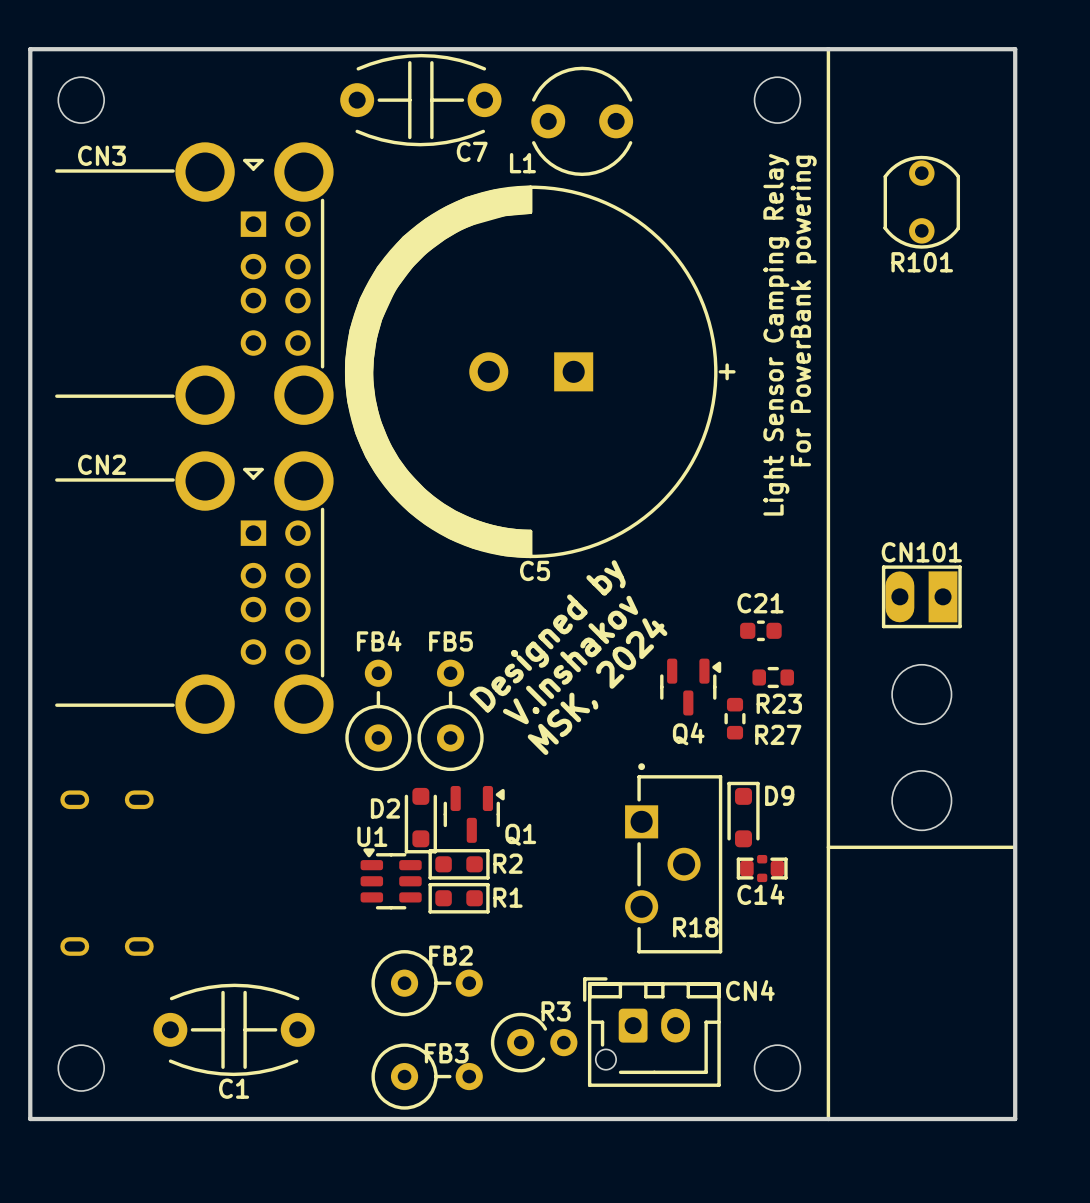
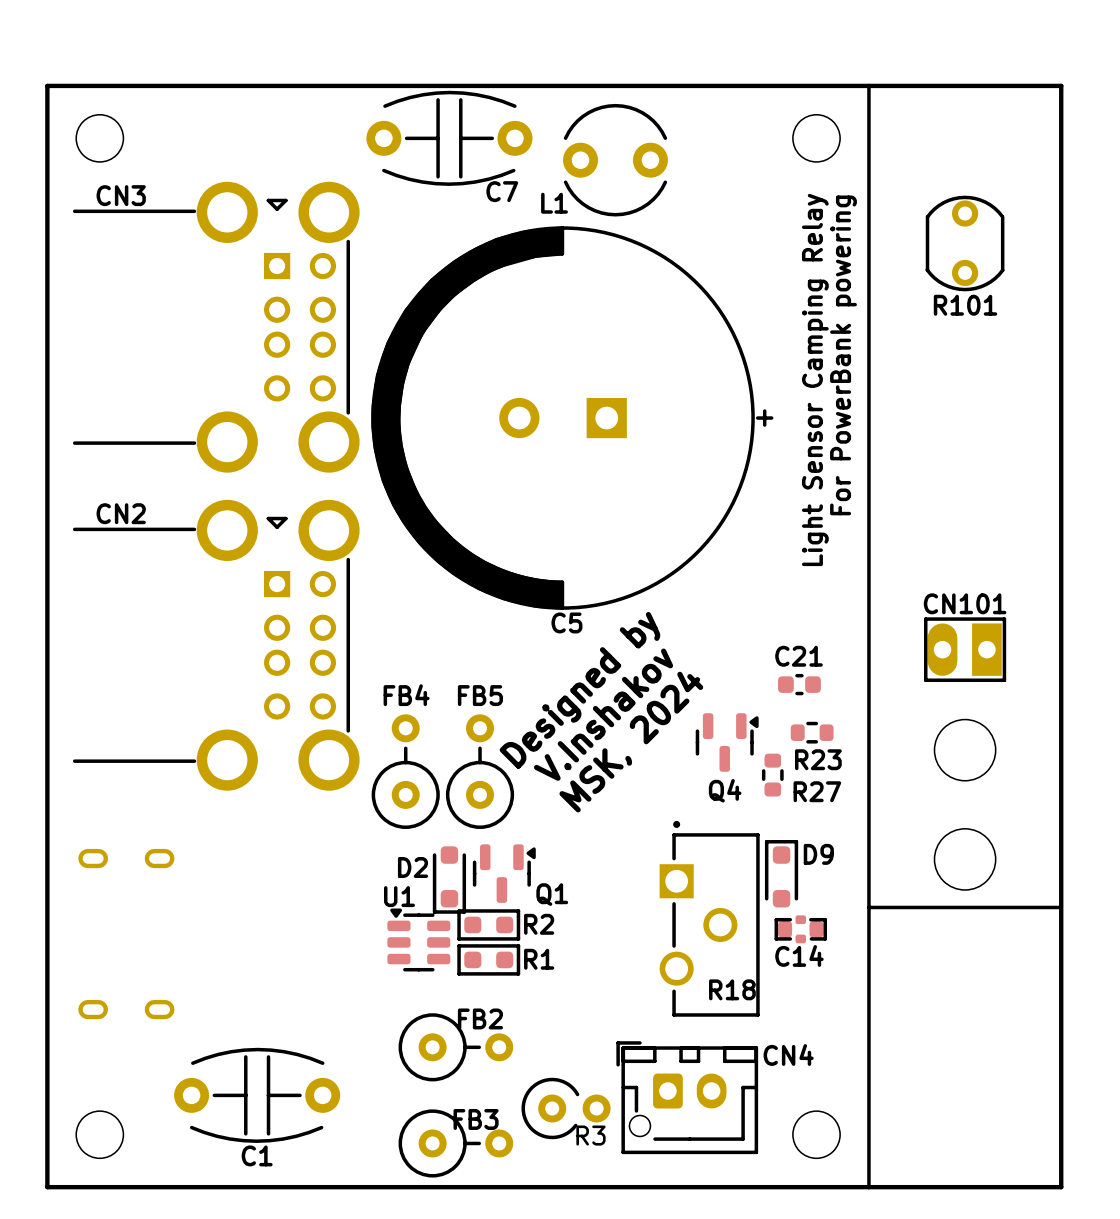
R3 name position: R3 (556, 1011) -> R3 (590, 1135)

